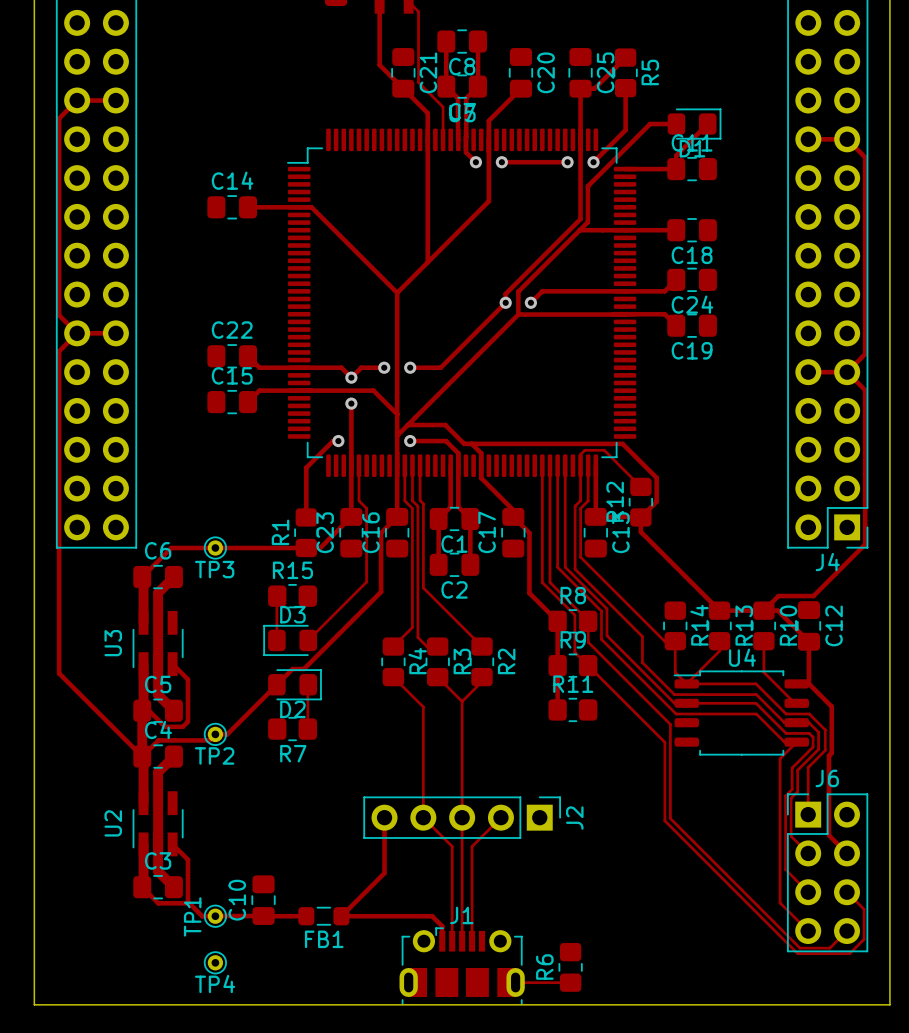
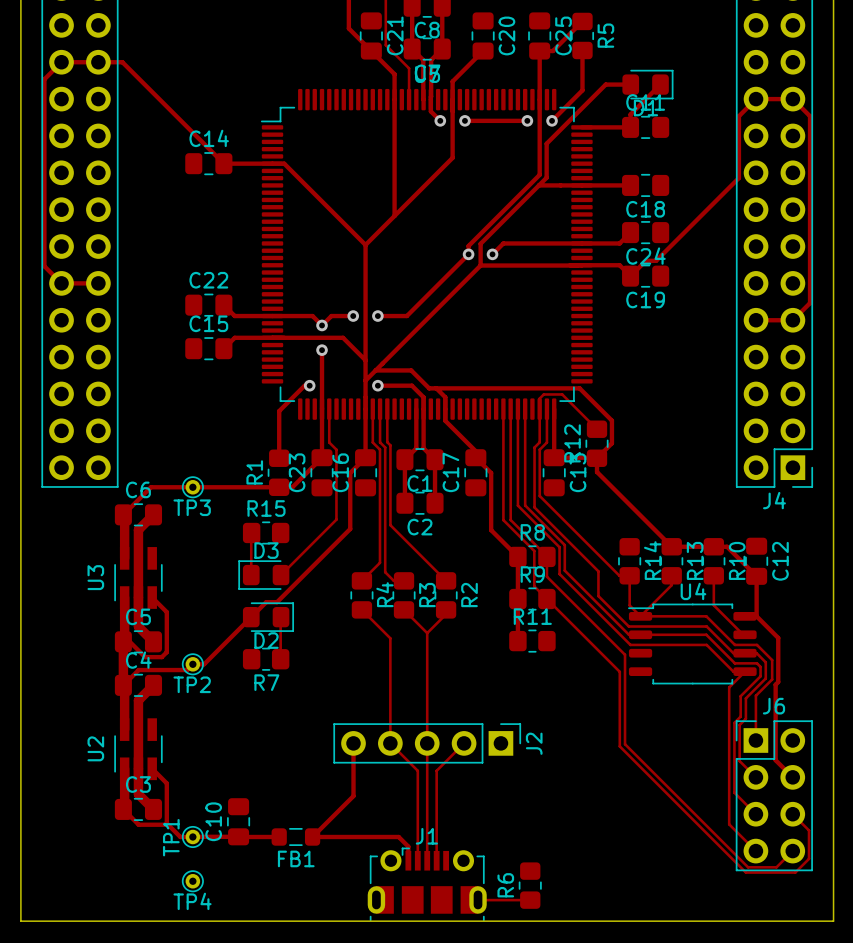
track: none -> (98, 62) (122, 62) (223, 163)
track: none -> (756, 99) (738, 116) (738, 178) (656, 260) (645, 260) (630, 276)
track: (77, 333) (59, 351) (59, 673) (142, 756) -> none
track: (847, 372) (865, 390) (865, 544) (813, 596) (778, 596) (763, 610) -> none

